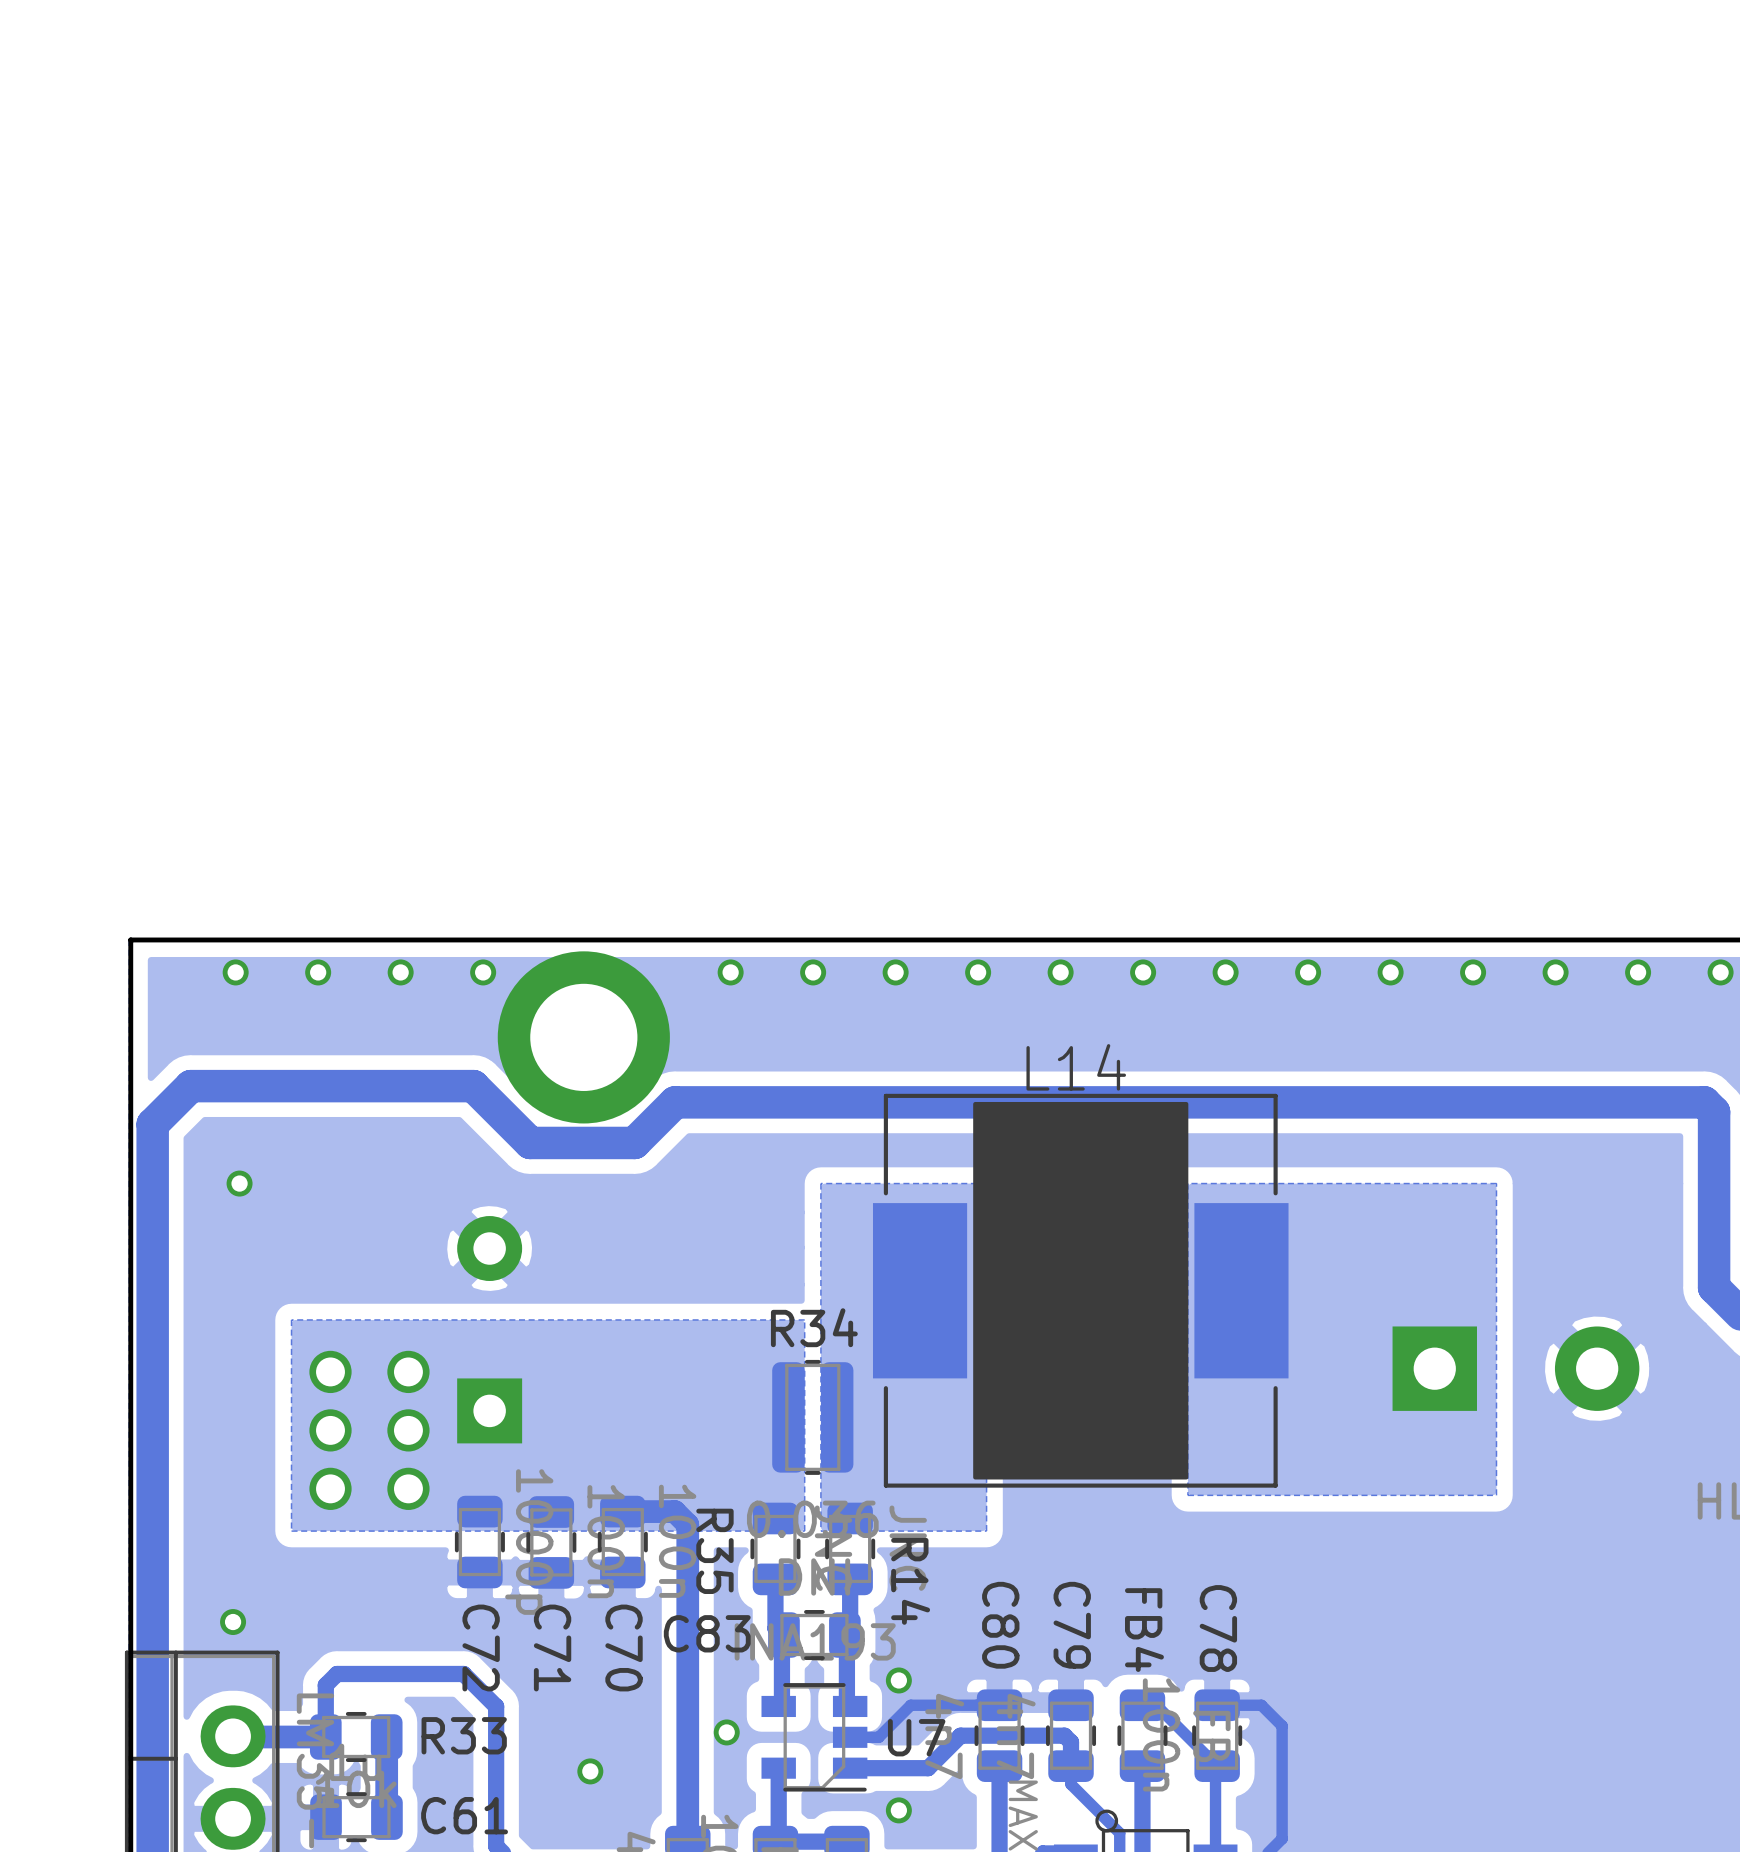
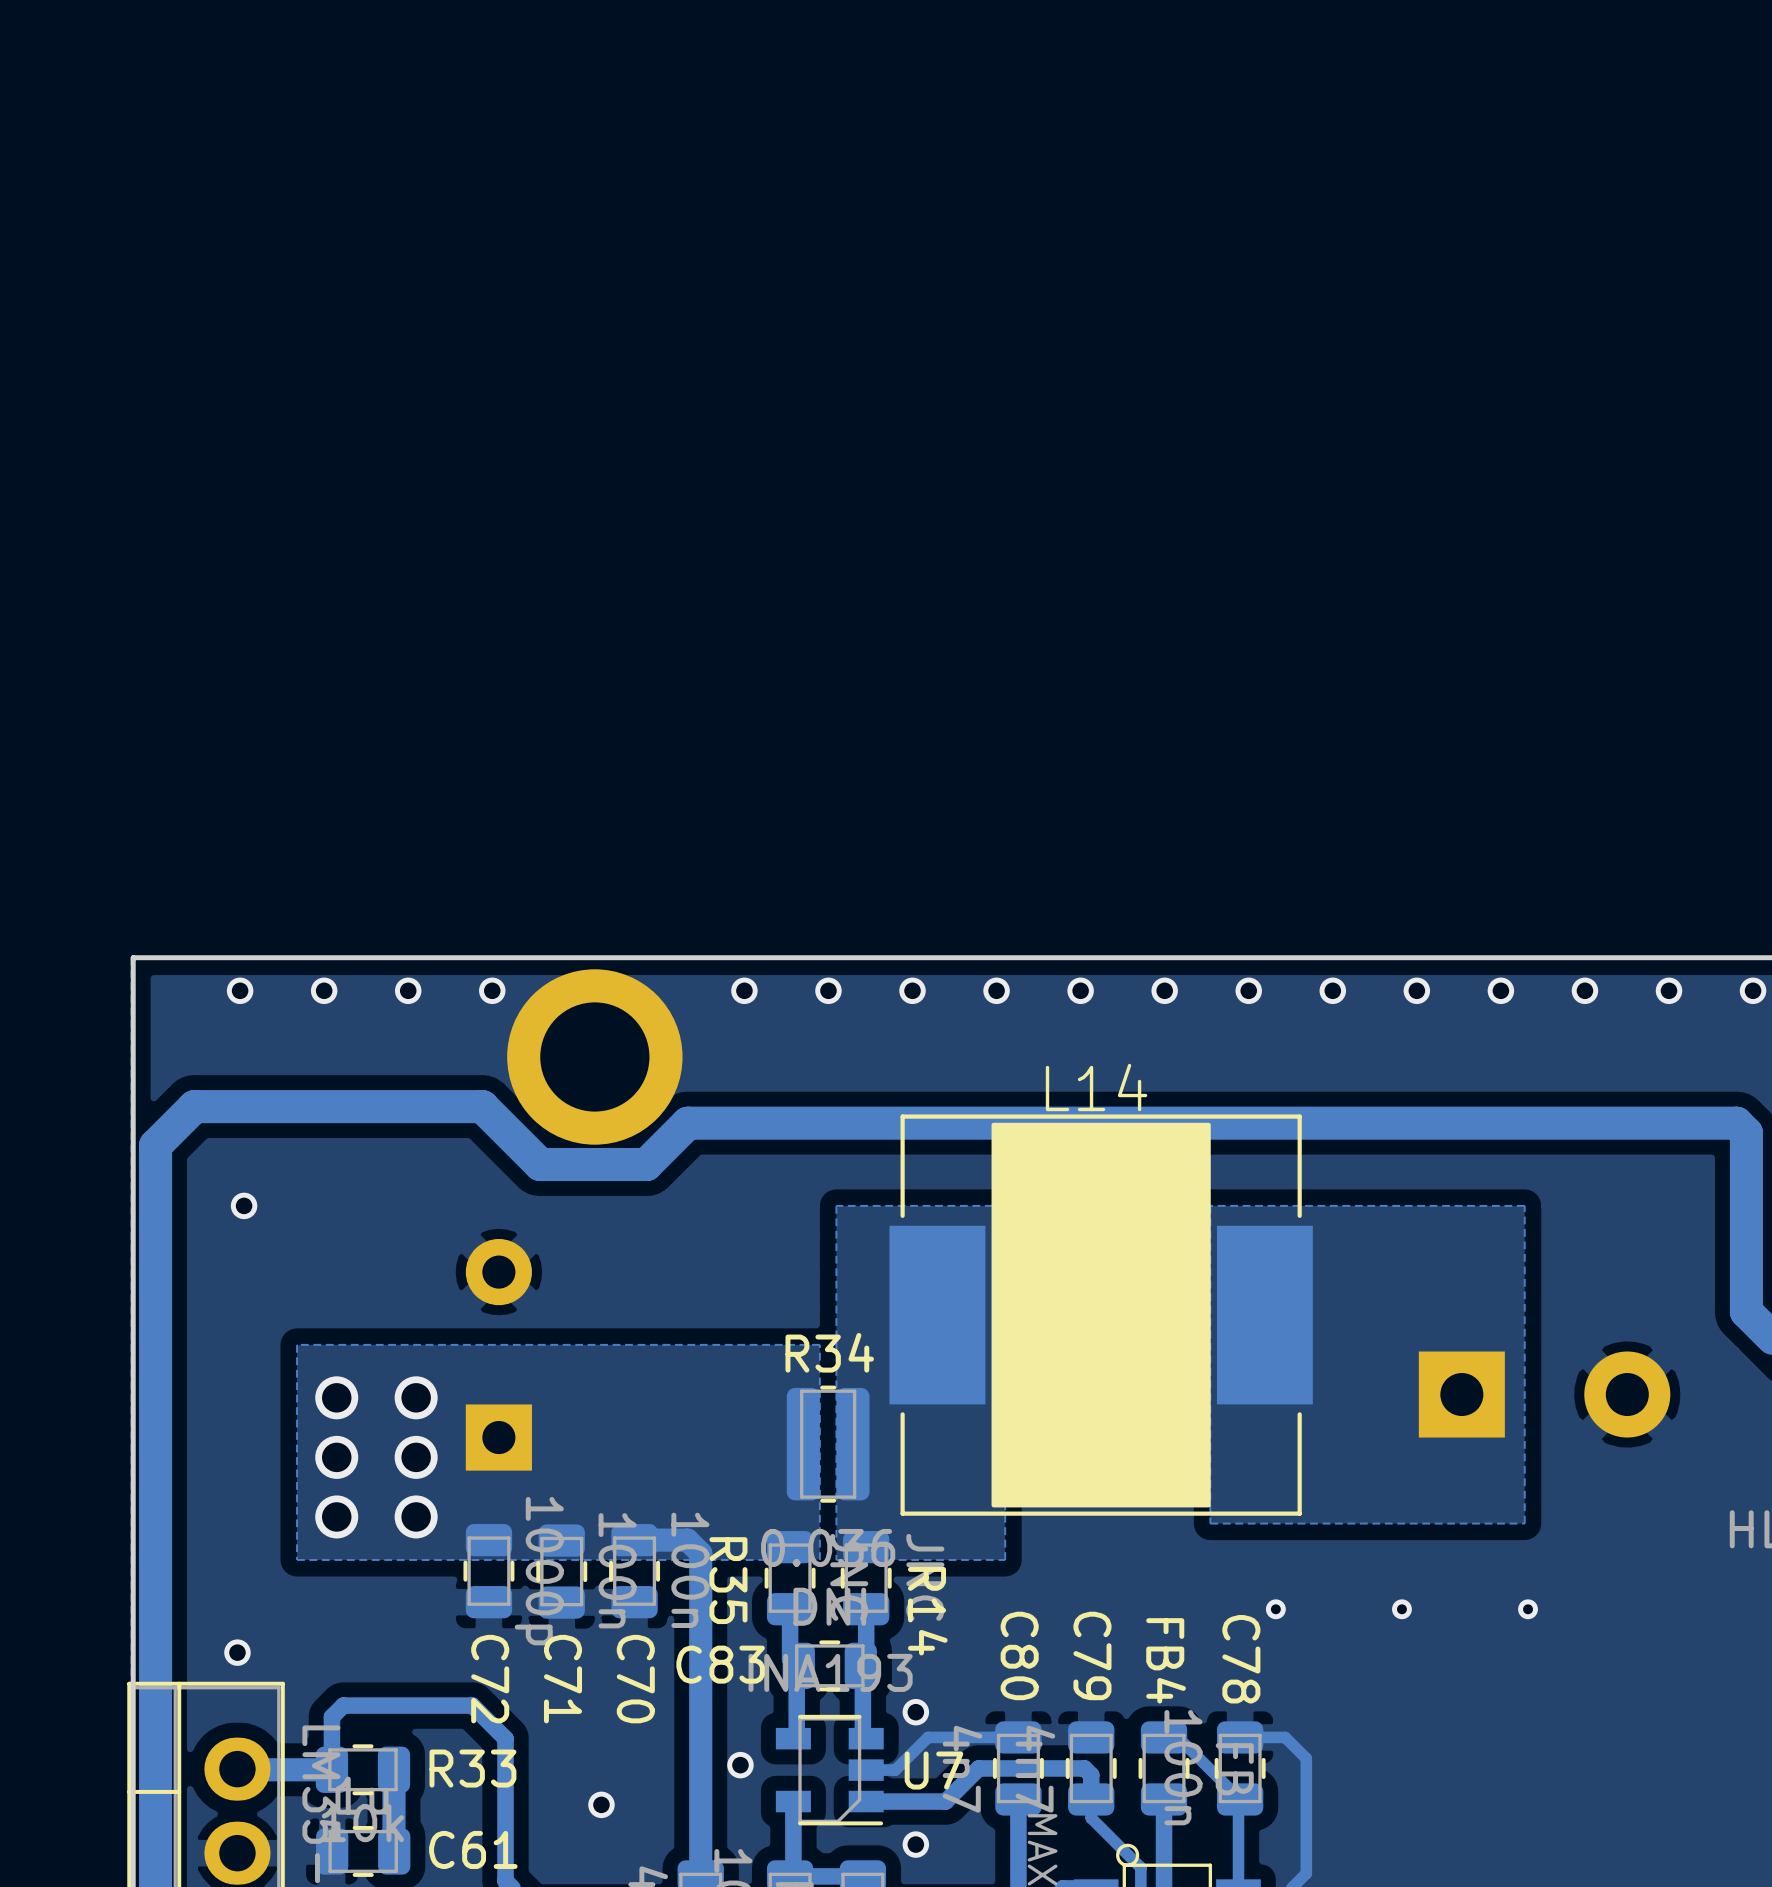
via: none -> (1275, 1609)
via: none -> (1401, 1609)
via: none -> (1528, 1609)

